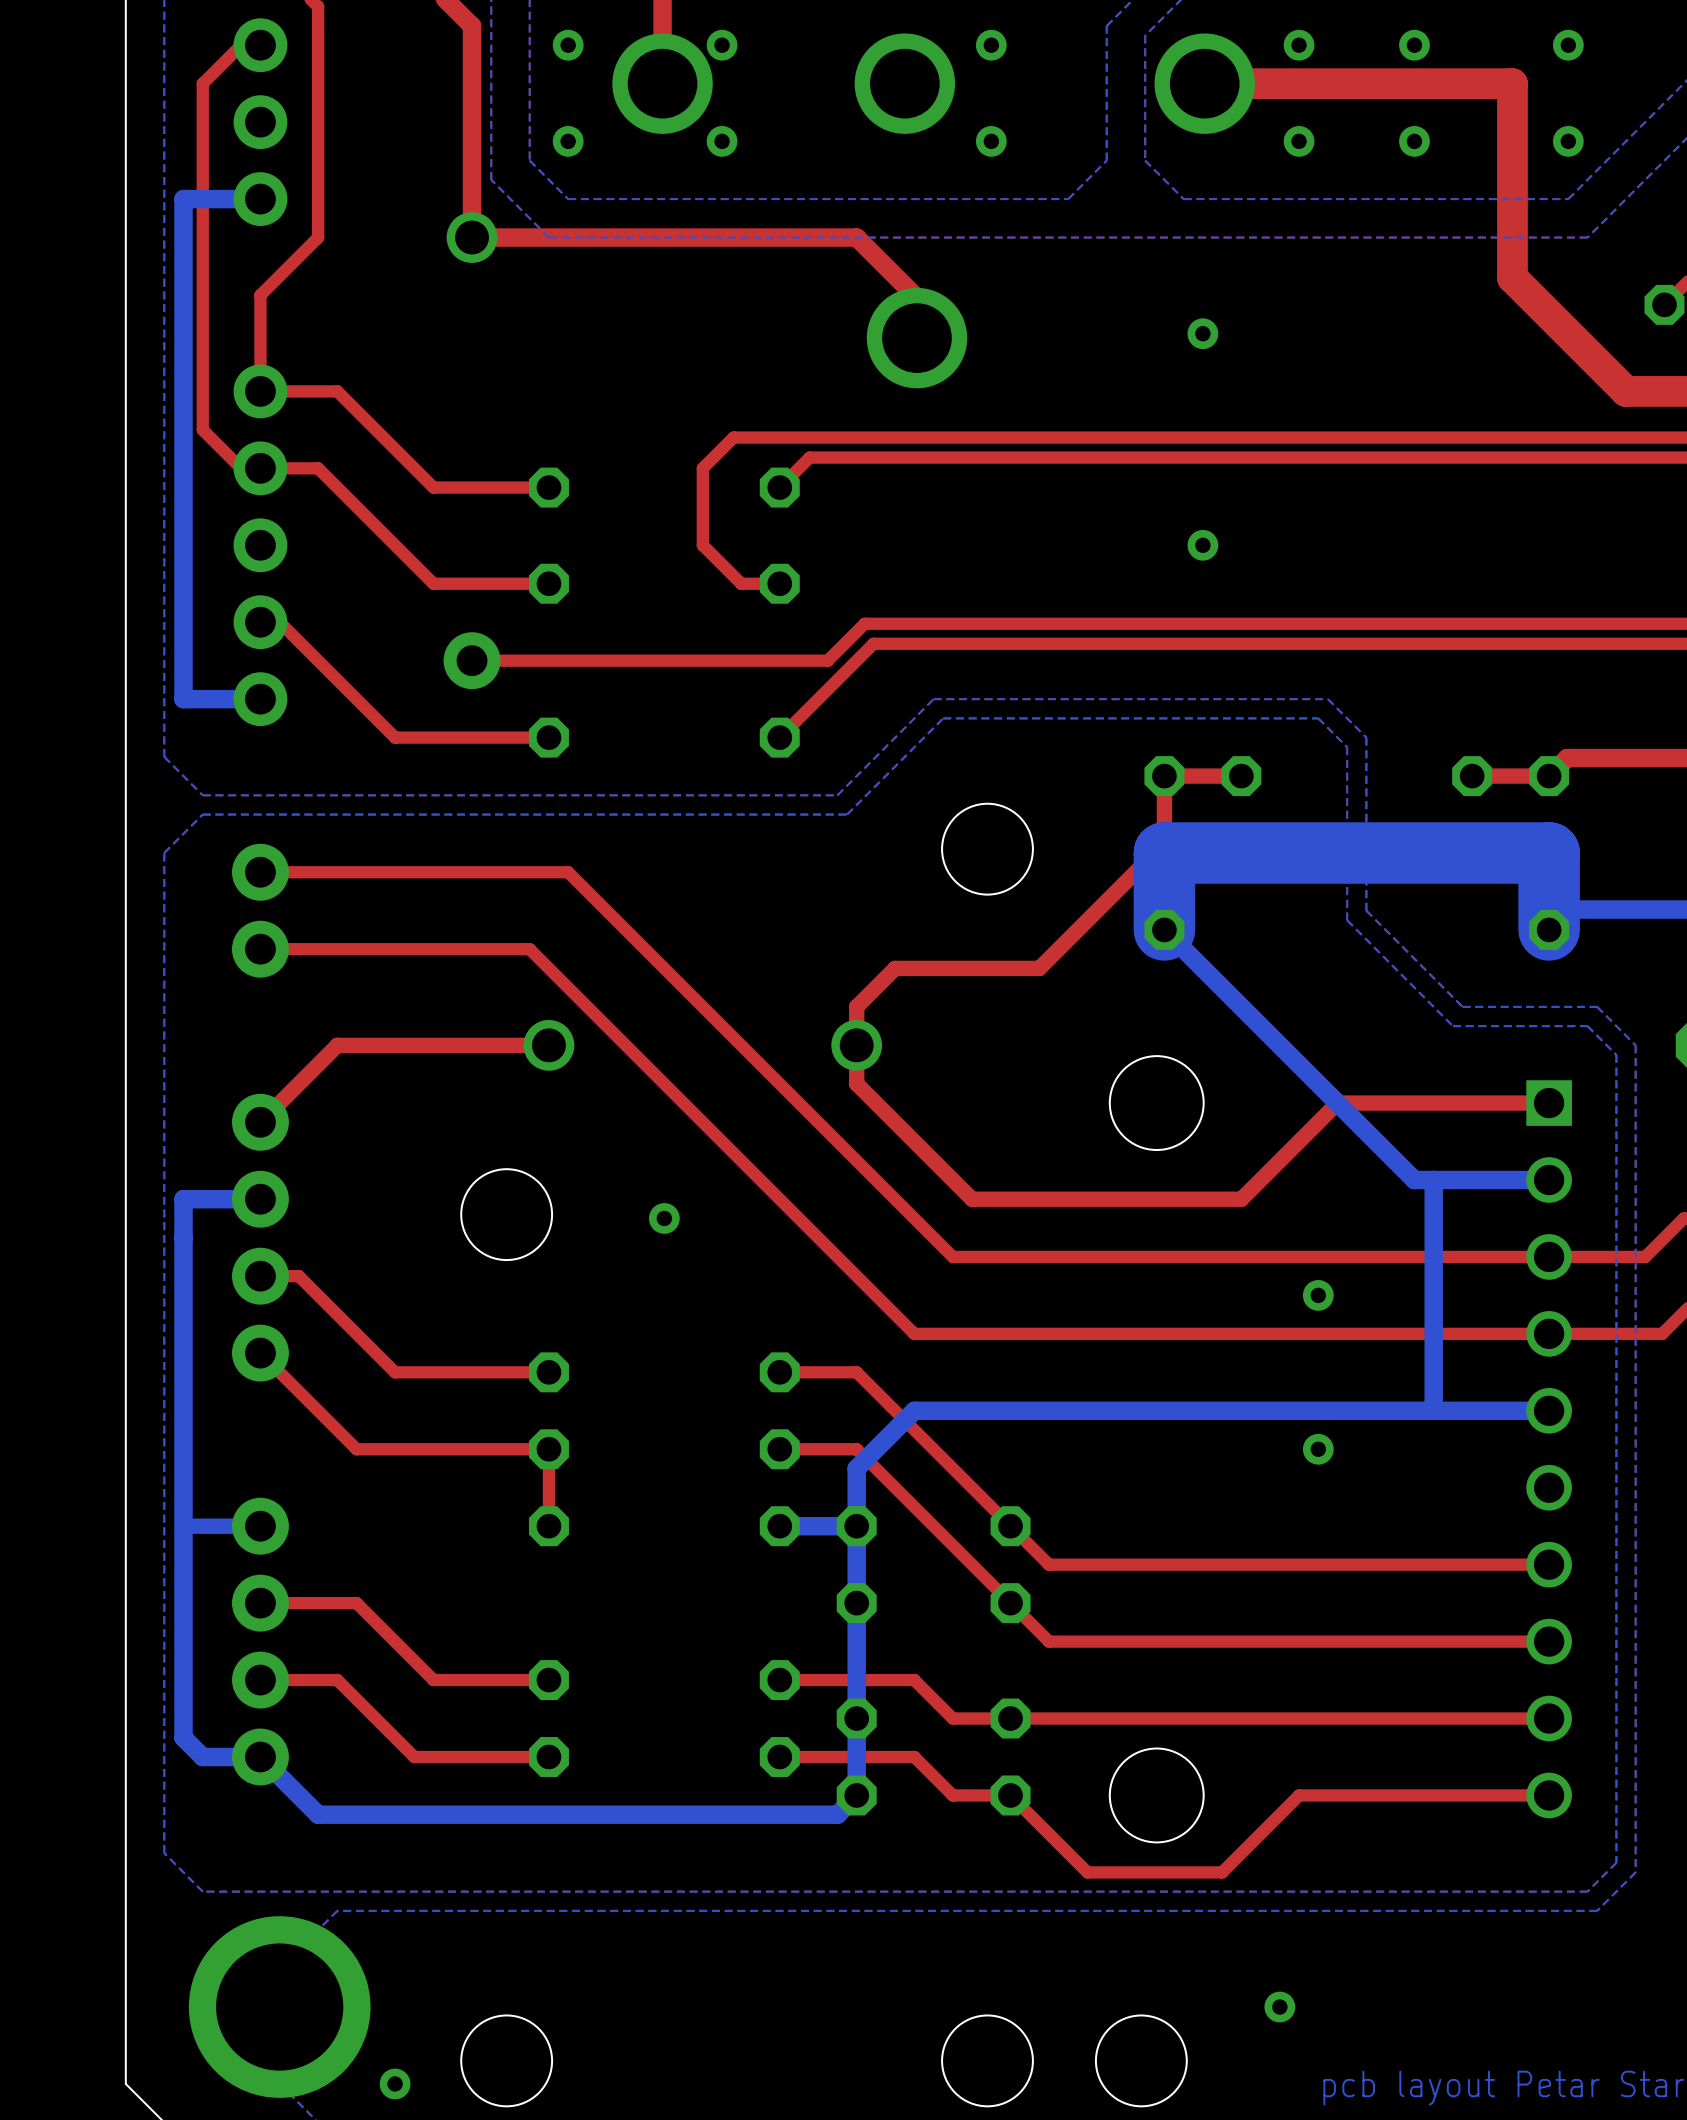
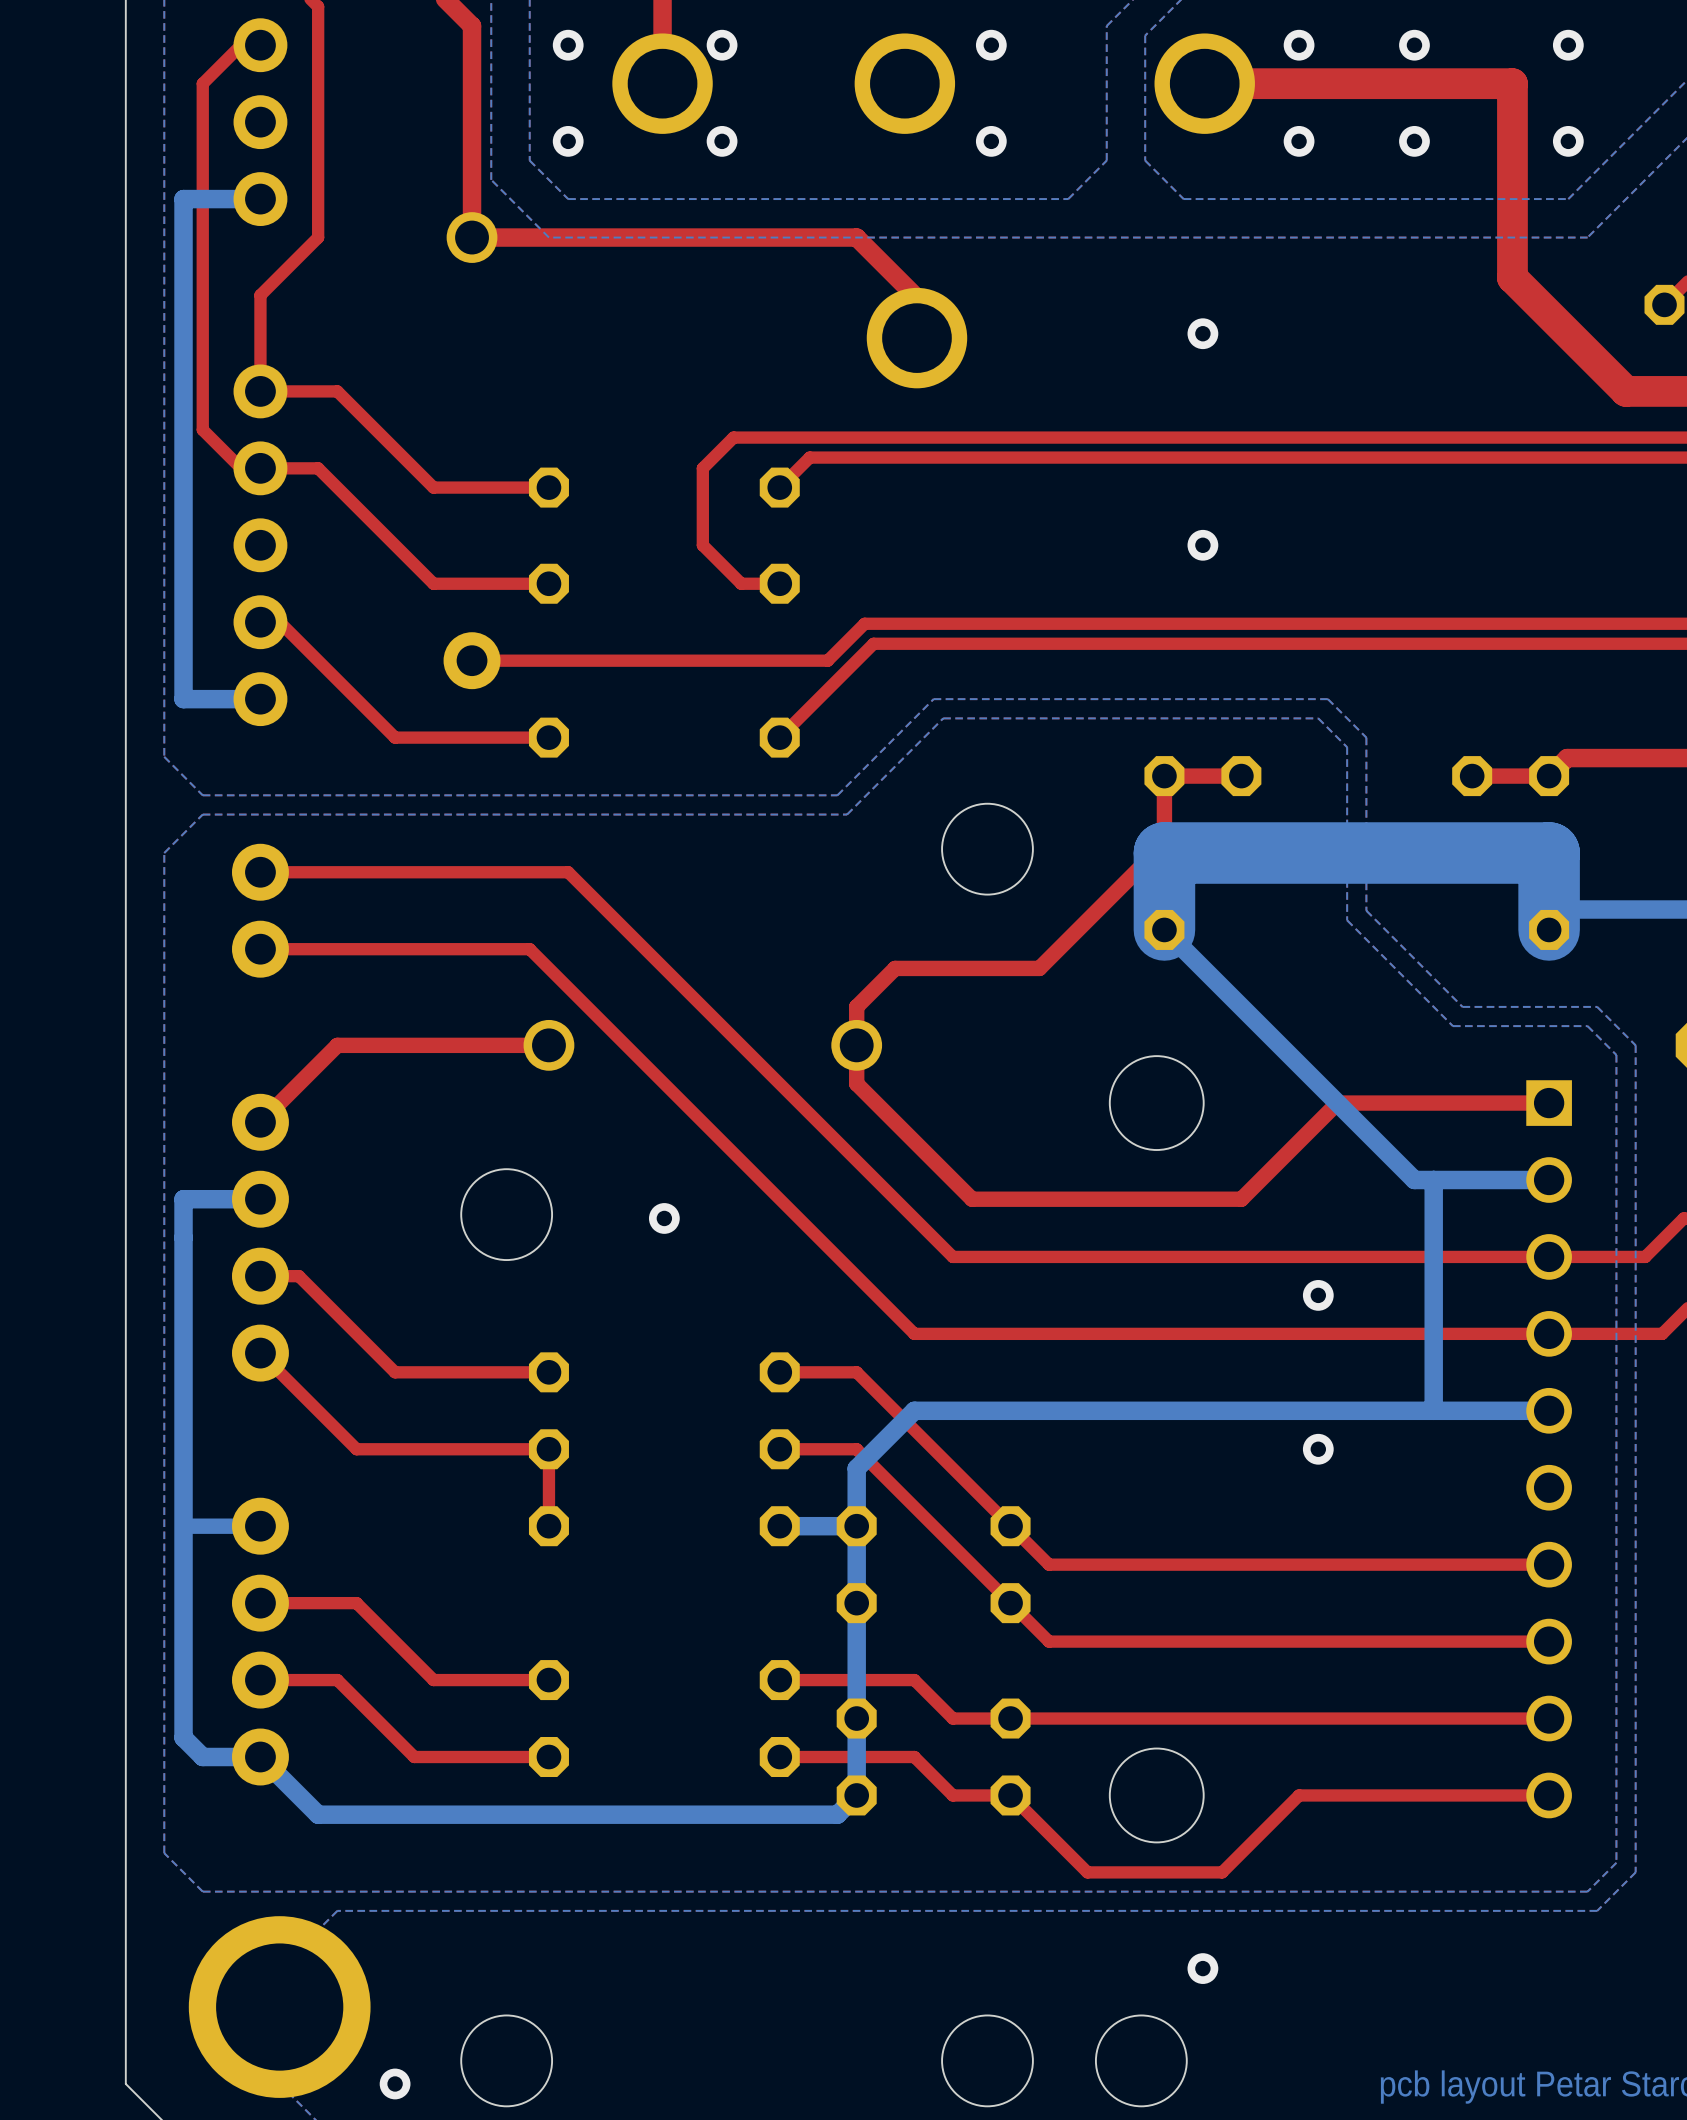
via position: (1279, 2007) -> (1202, 1968)

